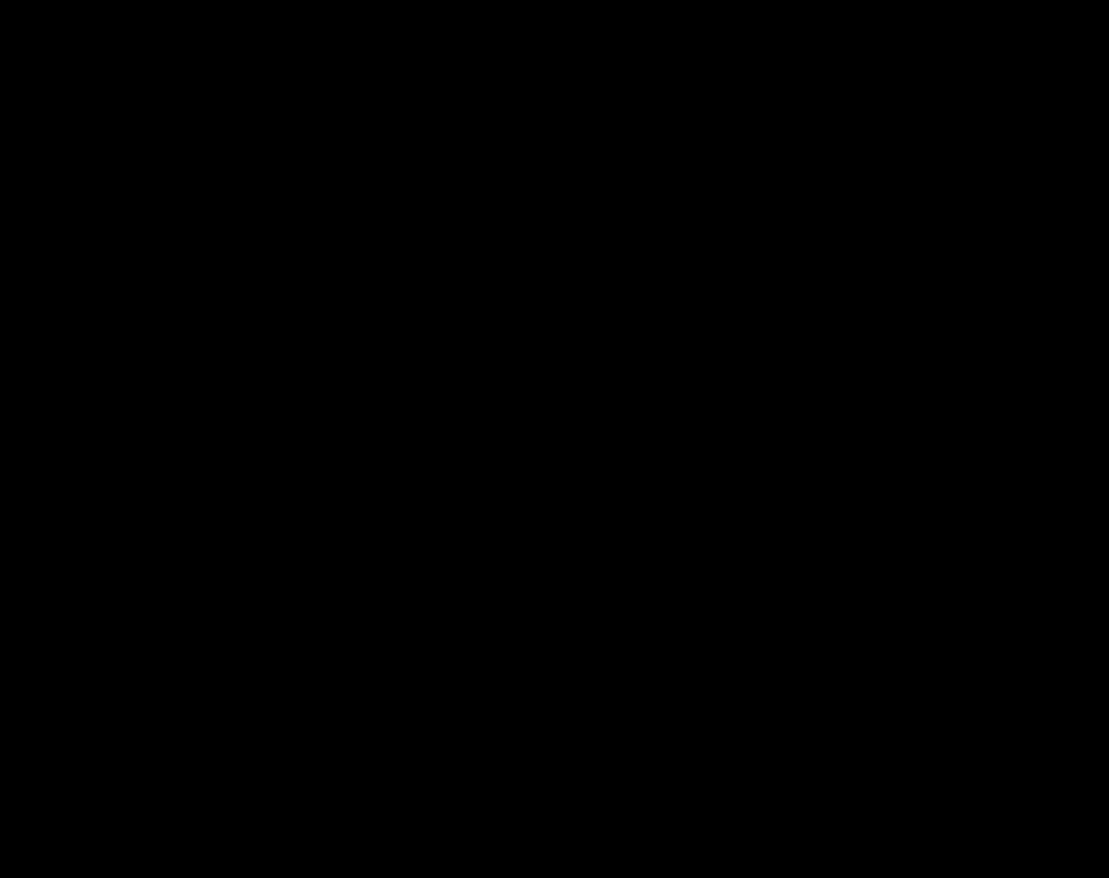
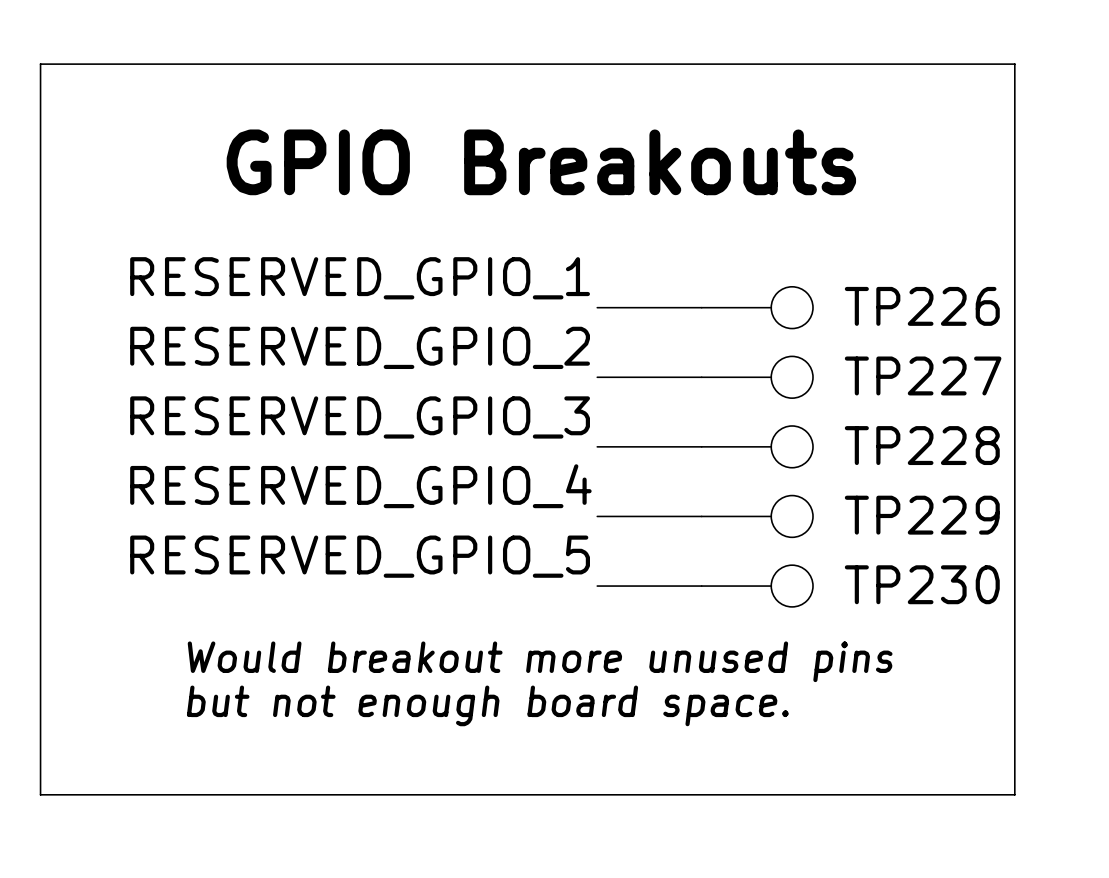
line: none -> (40, 64) (1014, 64) (1014, 794) (40, 794) (40, 64)
text: none -> GPIO Breakouts (541, 162)
label: none -> RESERVED_GPIO_1 (360, 278)
wire: none -> (597, 307) (701, 307)
TP226: none -> (757, 307)
label: none -> RESERVED_GPIO_2 (360, 347)
wire: none -> (597, 377) (701, 377)
TP227: none -> (757, 377)
label: none -> RESERVED_GPIO_3 (360, 417)
wire: none -> (597, 446) (701, 446)
TP228: none -> (757, 446)
label: none -> RESERVED_GPIO_4 (360, 486)
wire: none -> (597, 516) (701, 516)
TP229: none -> (757, 516)
label: none -> RESERVED_GPIO_5 (360, 556)
wire: none -> (597, 586) (701, 586)
TP230: none -> (757, 586)
text: none -> Would breakout more unused pins (540, 661)
text: none -> but not enough board space. (487, 705)

